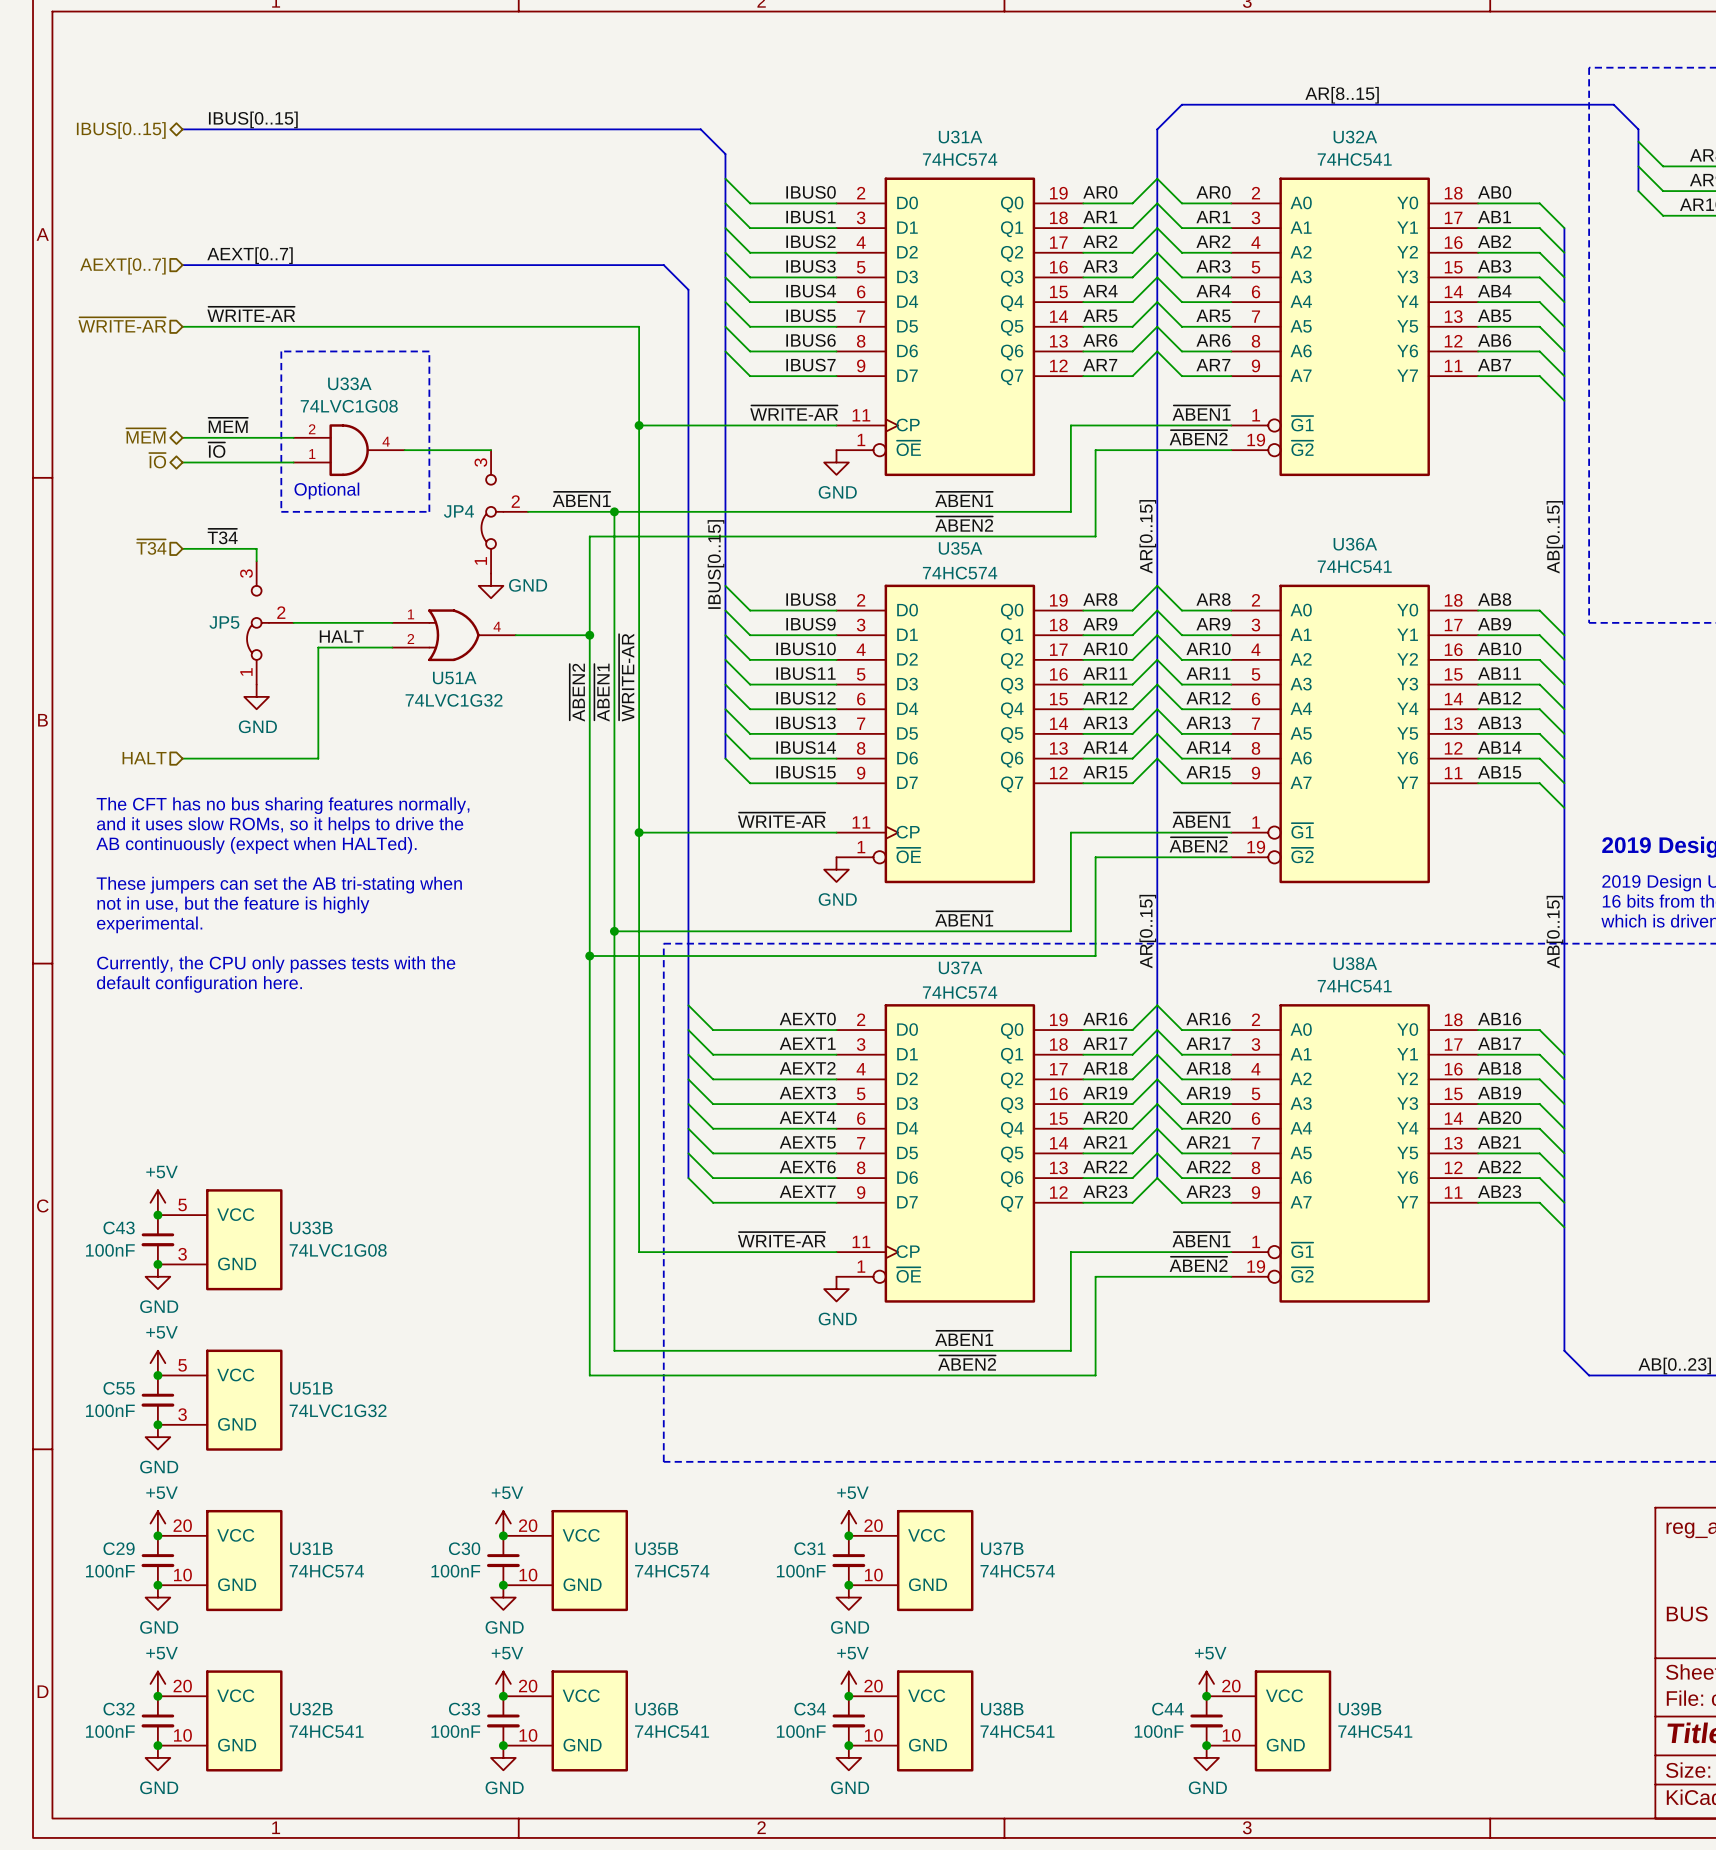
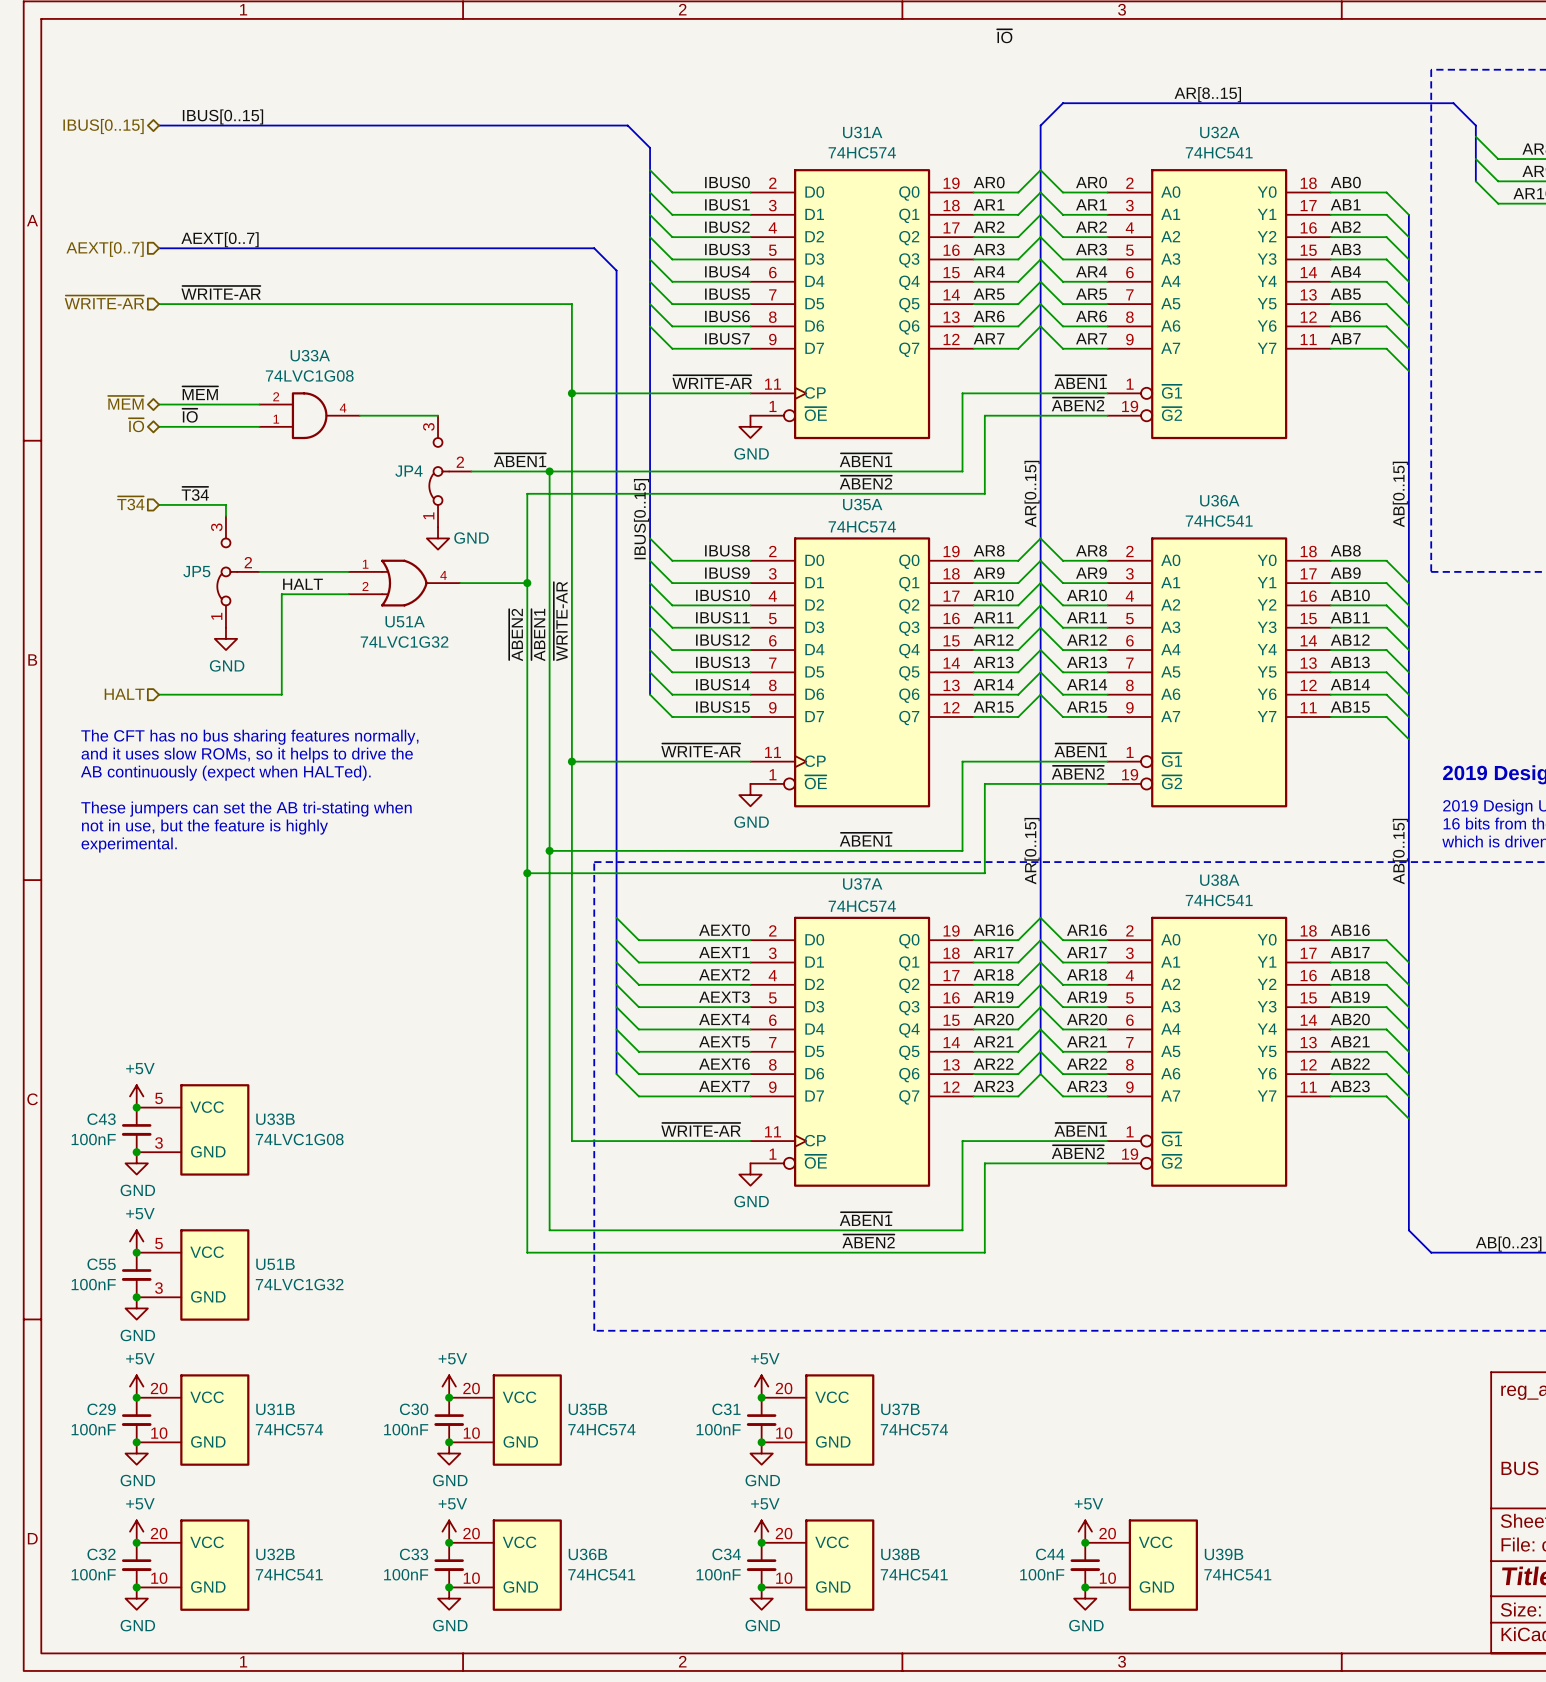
label: none -> ~{IO} (1004, 36)
line: (281, 351) (281, 511) (429, 511) (429, 351) (281, 351) -> none
text: Optional (326, 490) -> none
text: Currently, the CPU only passes tests with the (276, 964) -> none
text: default configuration here. (199, 984) -> none

